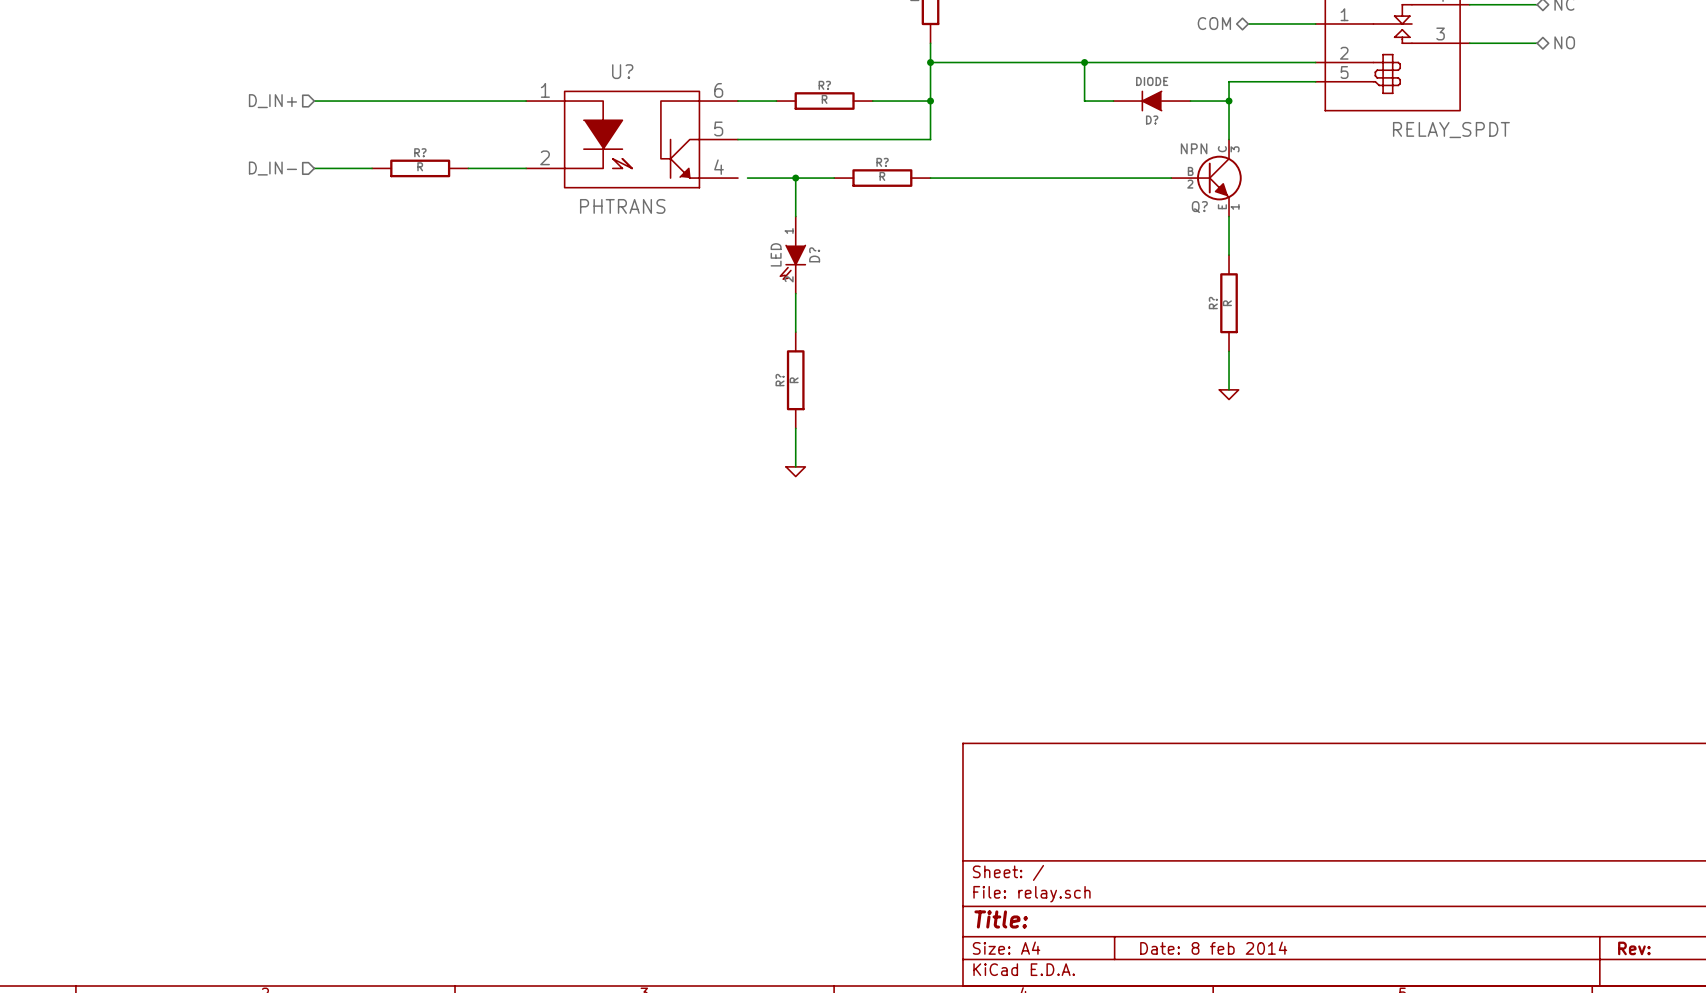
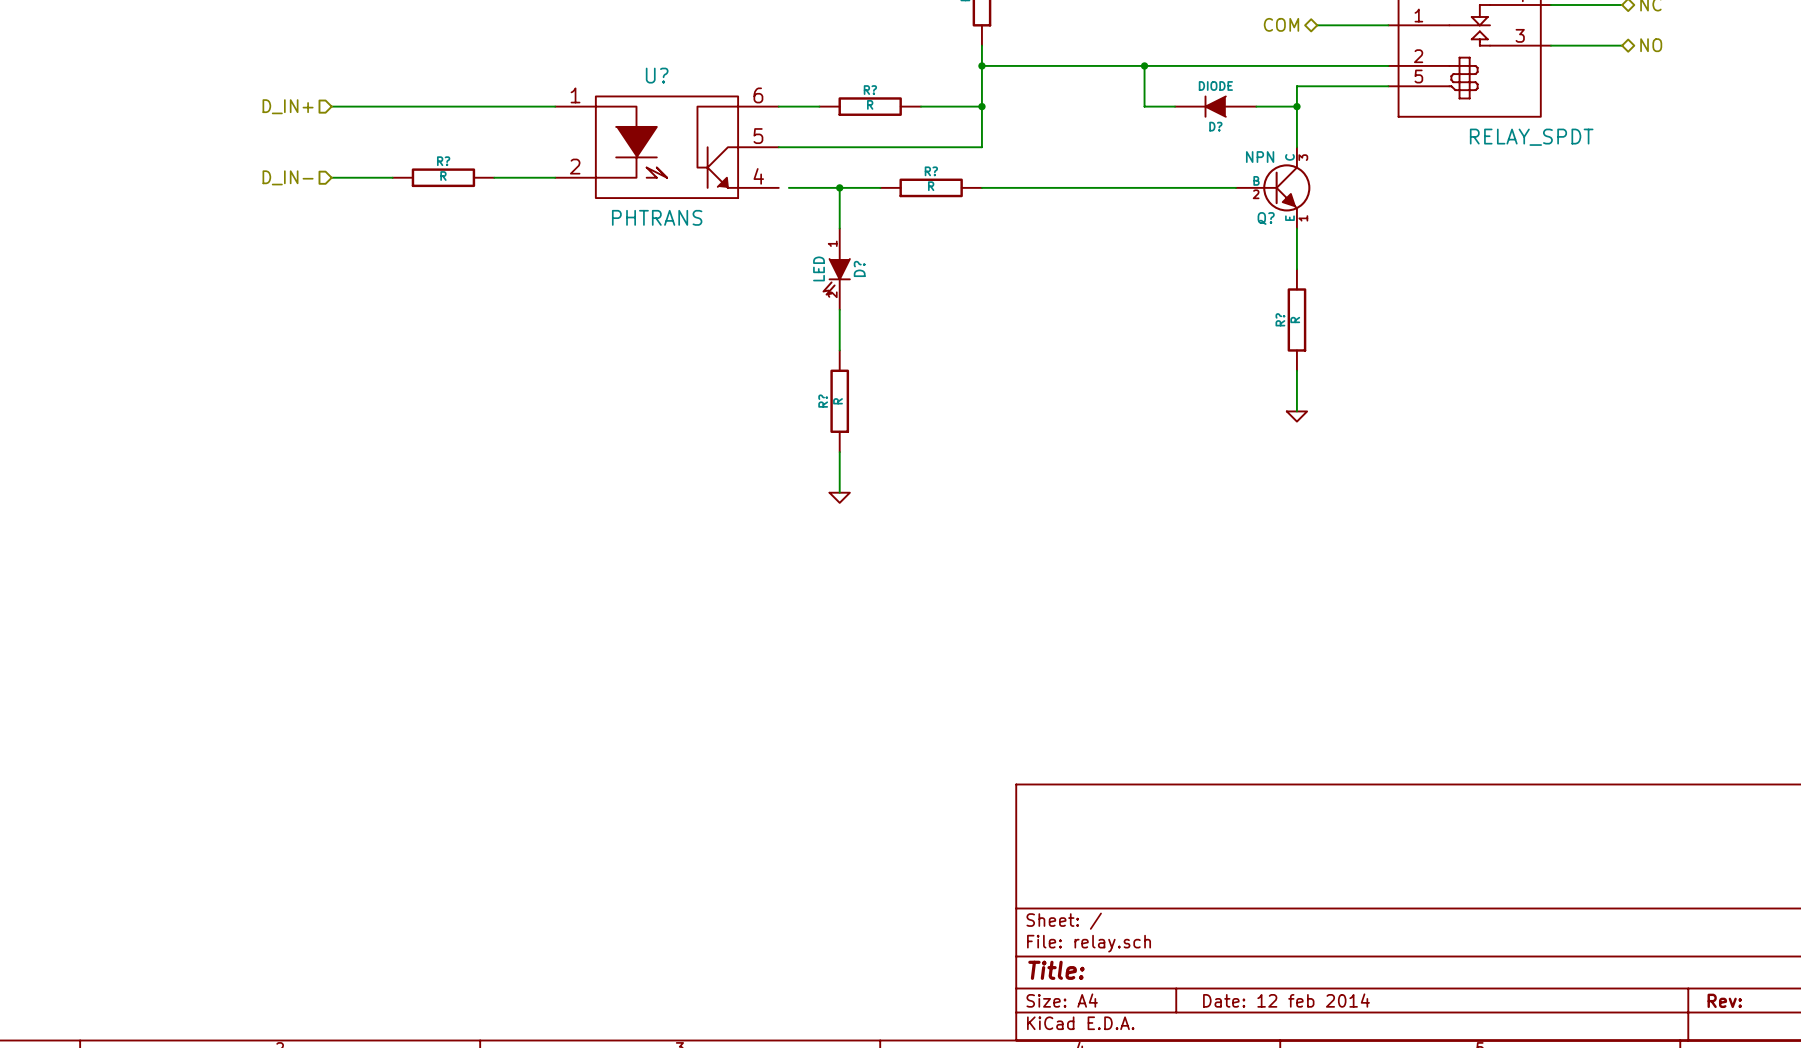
title block: Date: 8 feb 2014 (1213, 948) -> Date: 12 feb 2014 (1286, 1000)

